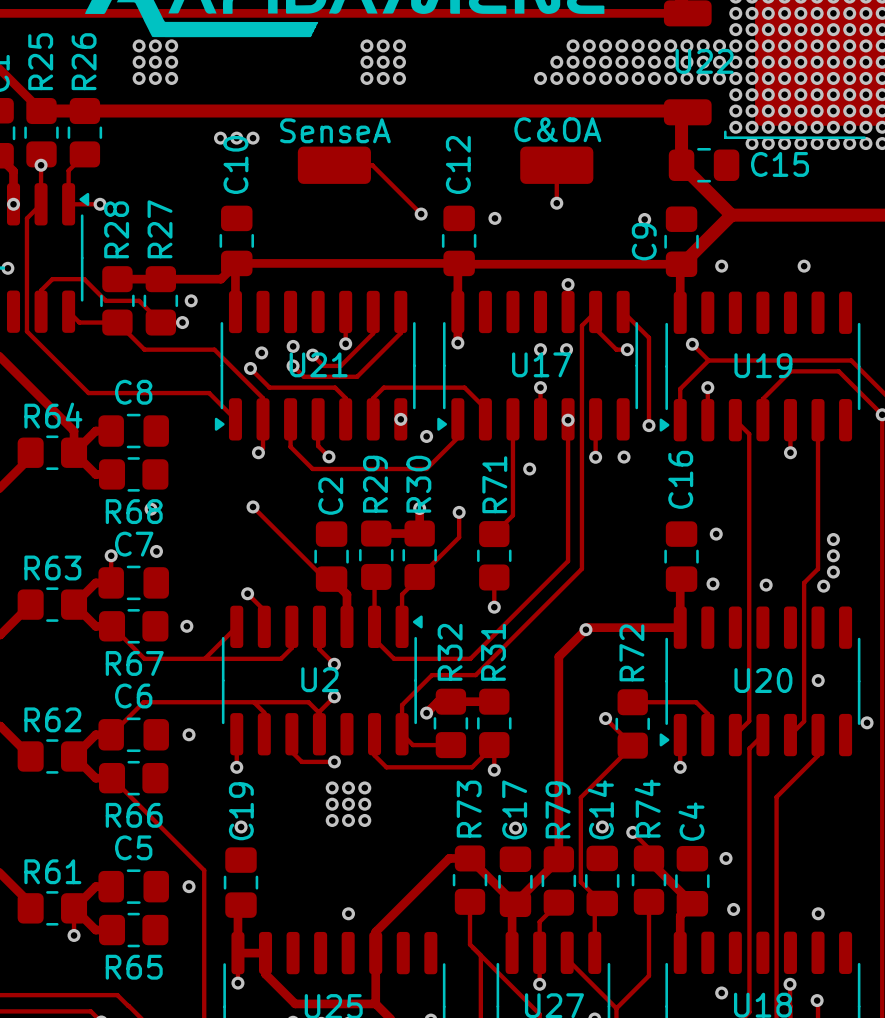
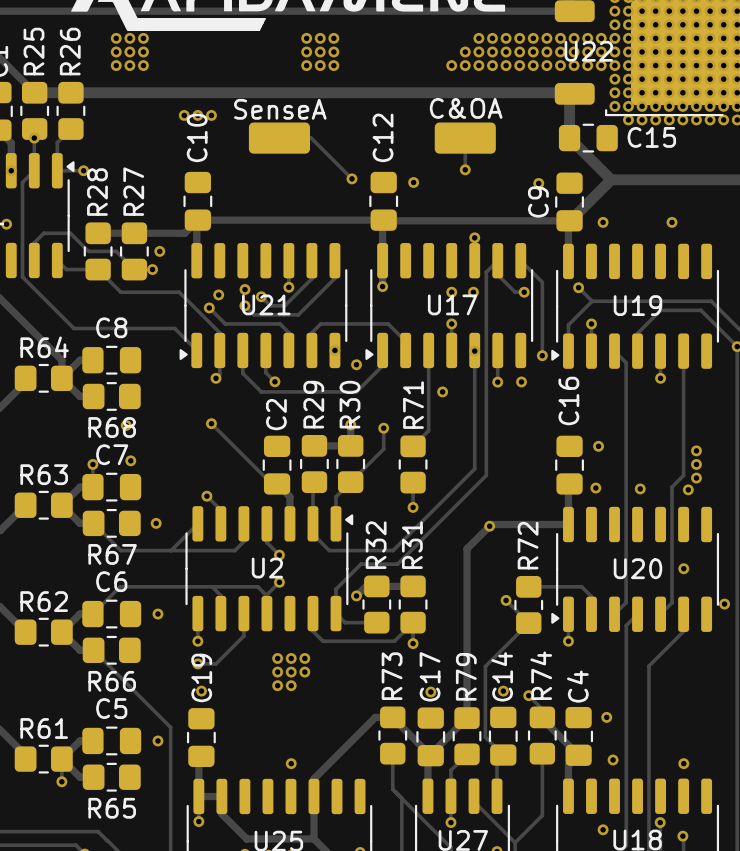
track: (291, 751) (301, 761) (334, 761) -> (243, 628) (243, 635) (215, 663) (197, 663)
via: (334, 761) -> none
via: none -> (197, 663)
via: (364, 820) -> none

